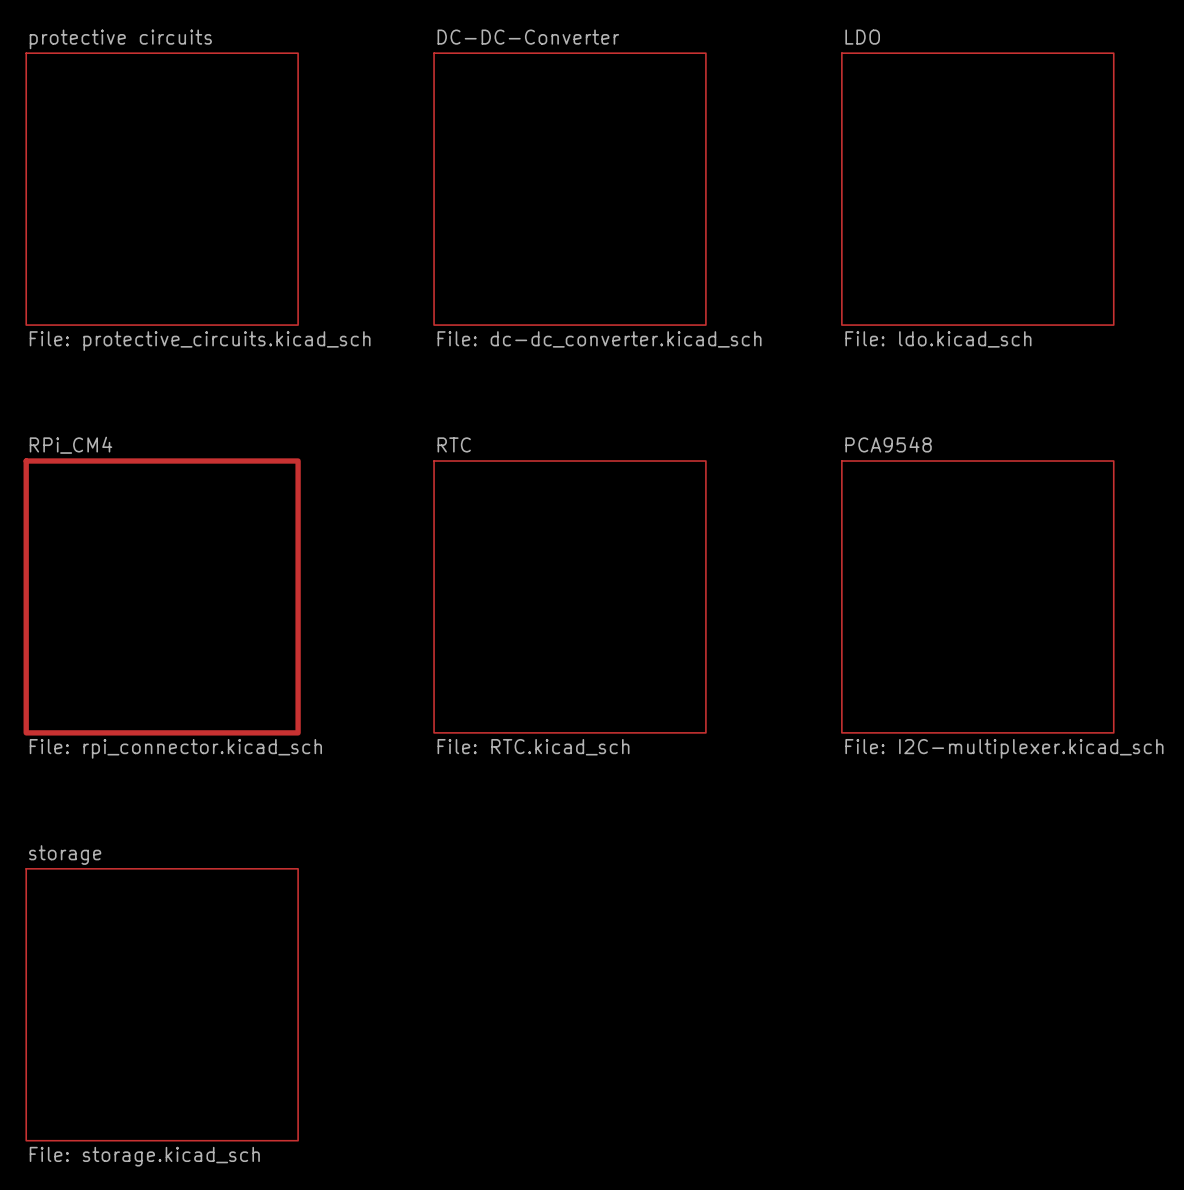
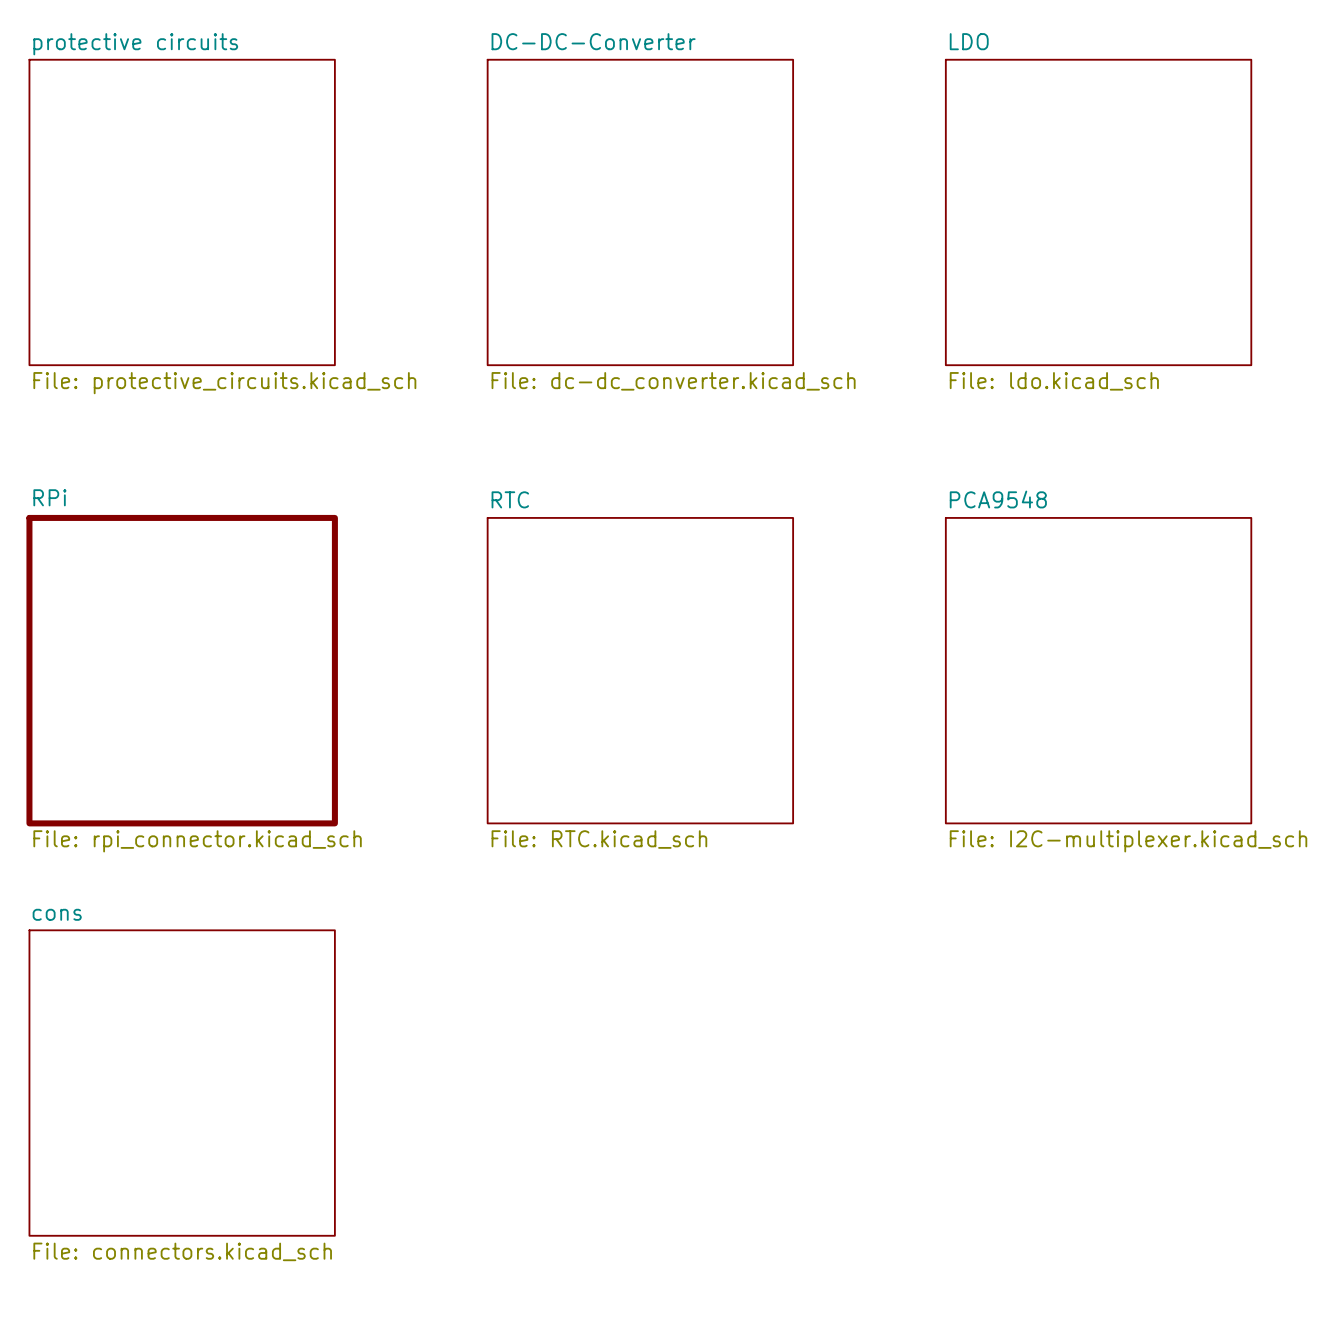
sheet RPi_CM4 name: RPi_CM4 (70, 445) -> RPi (49, 497)
sheet cons: none -> File: connectors.kicad_sch (182, 1083)
sheet storage: File: storage.kicad_sch (162, 1004) -> none

